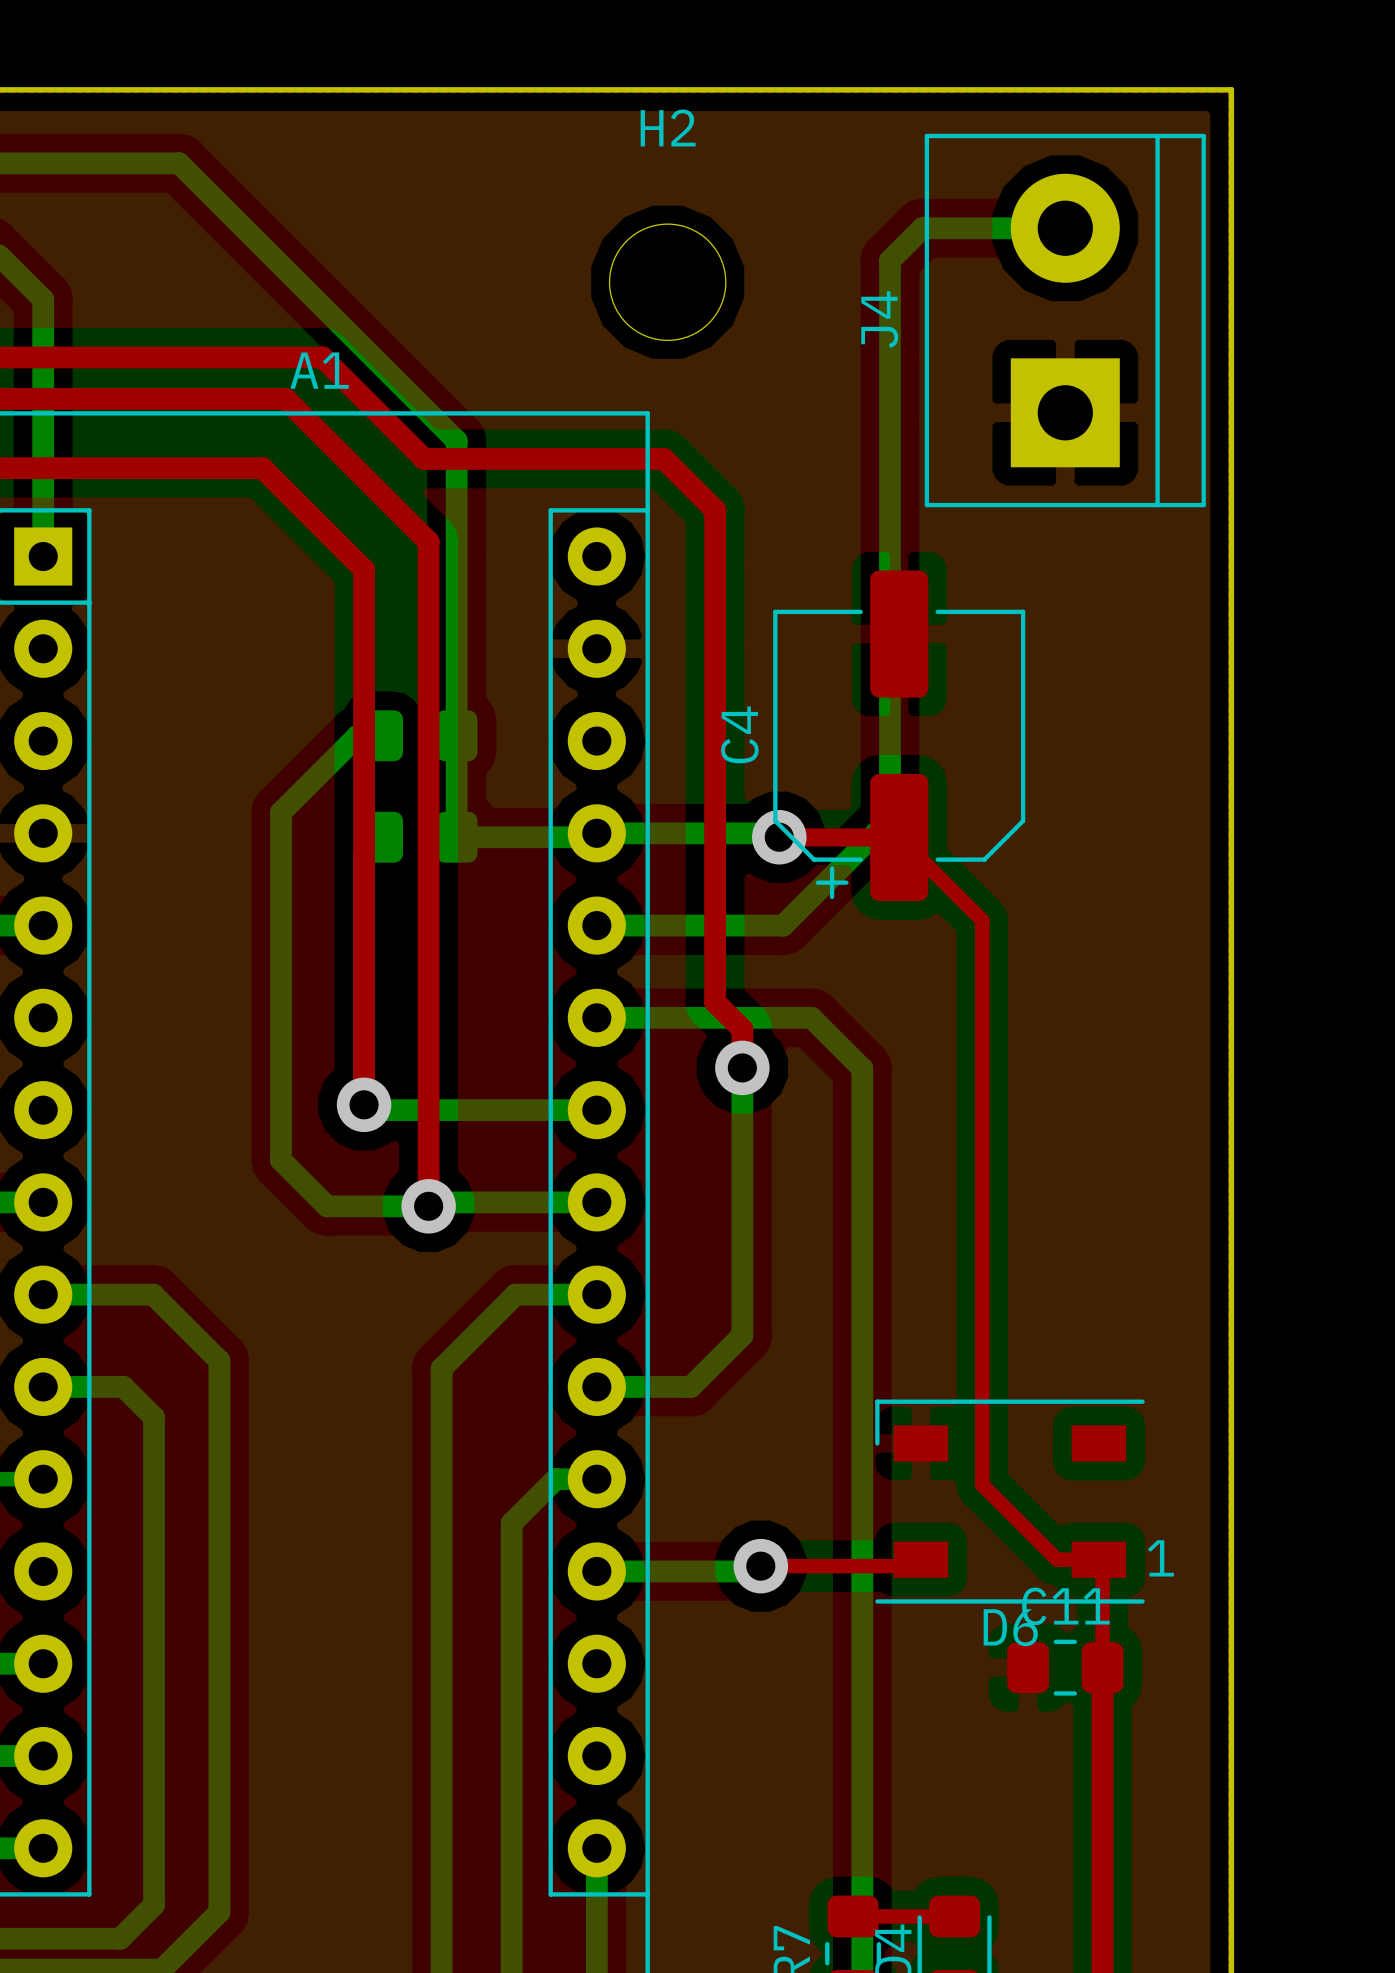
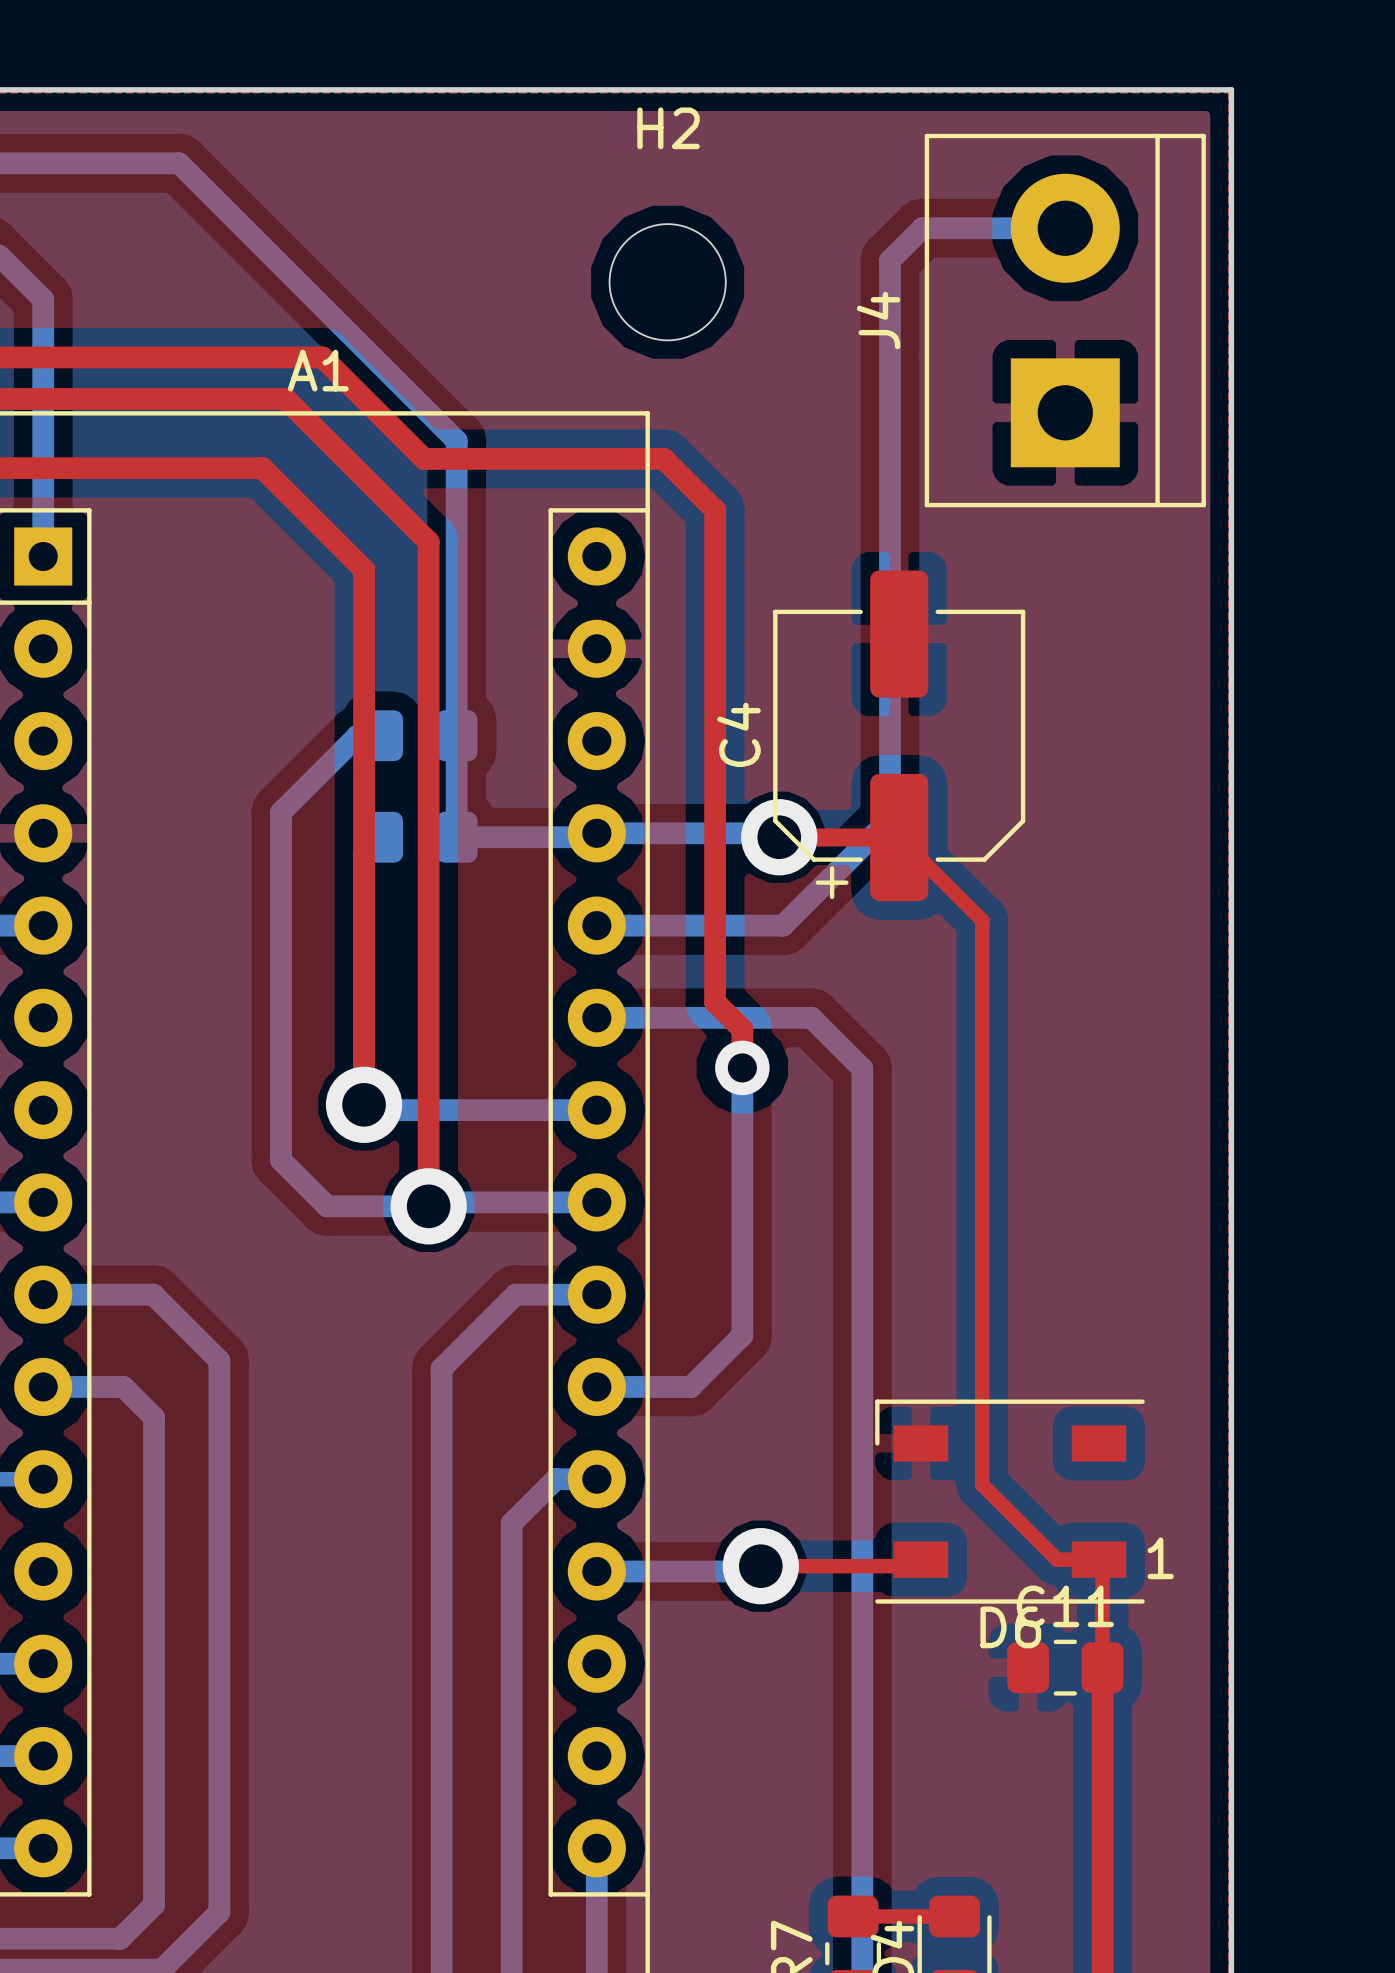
via size: [752, 810, 807, 865] -> [741, 799, 818, 876]
via size: [336, 1077, 392, 1133] -> [325, 1066, 403, 1143]
via size: [401, 1179, 456, 1234] -> [390, 1168, 467, 1245]
via size: [733, 1538, 789, 1594] -> [722, 1528, 799, 1605]

